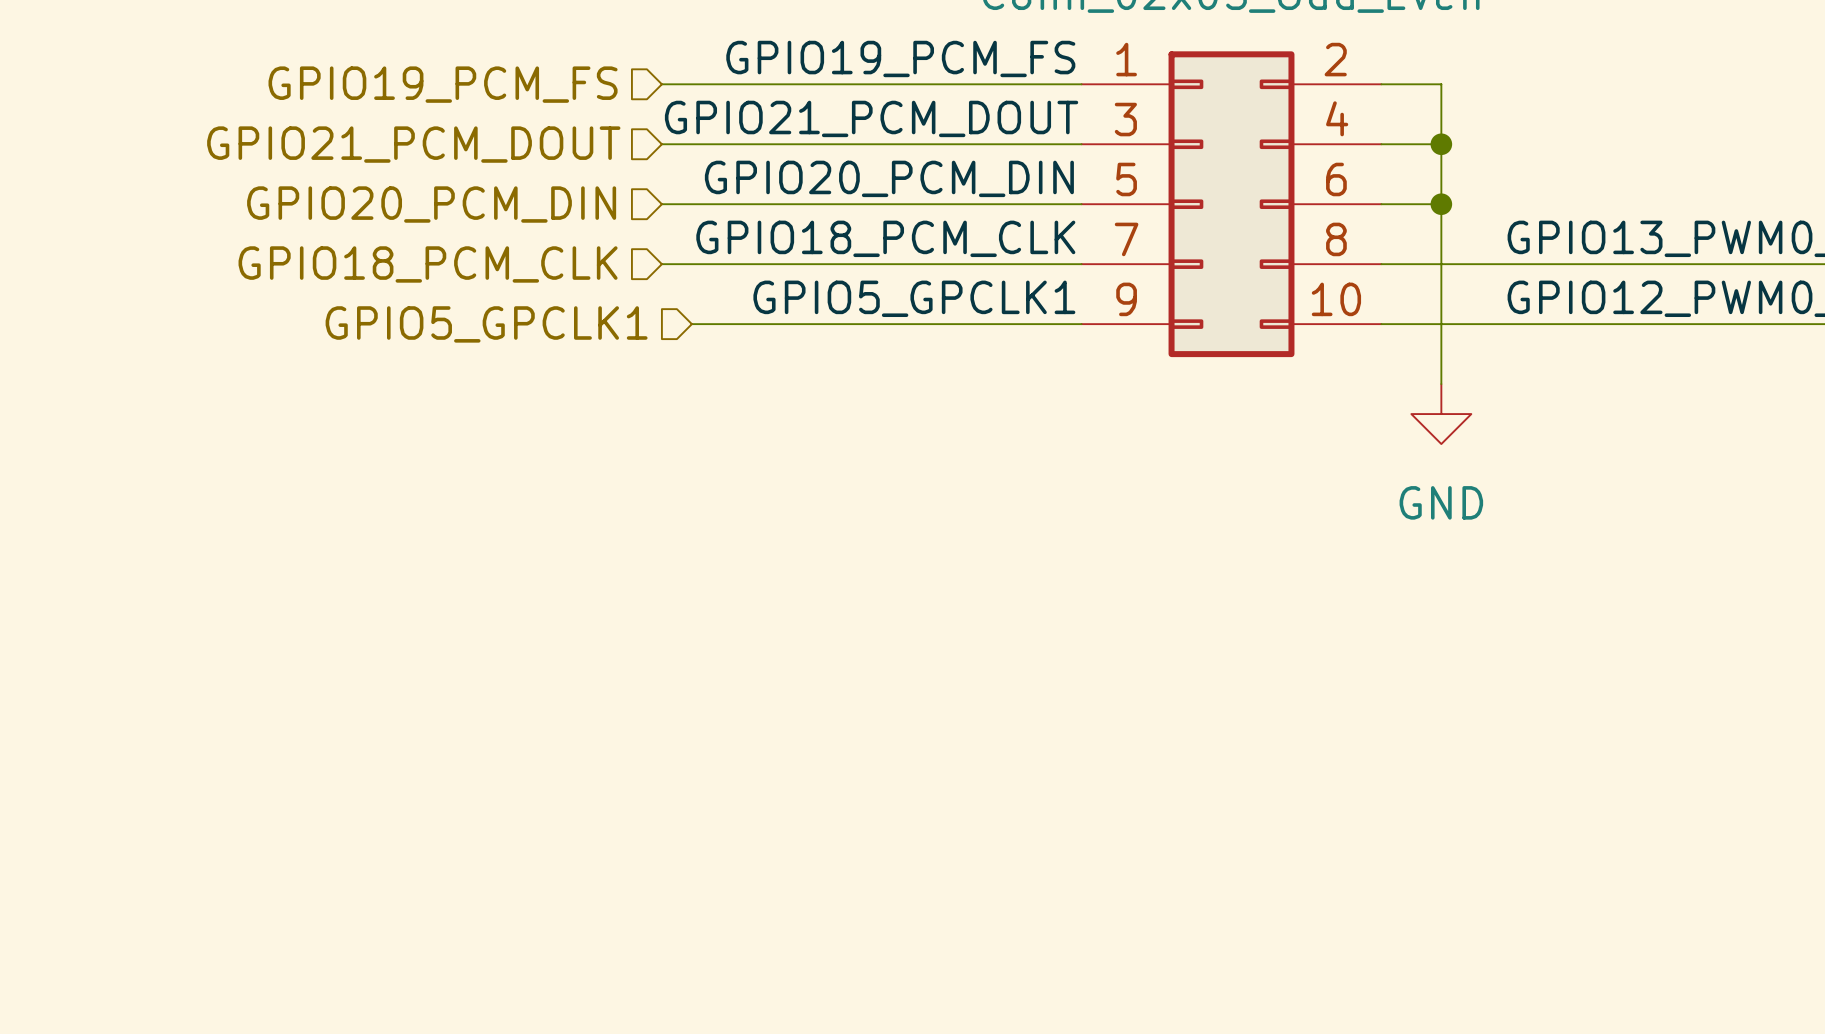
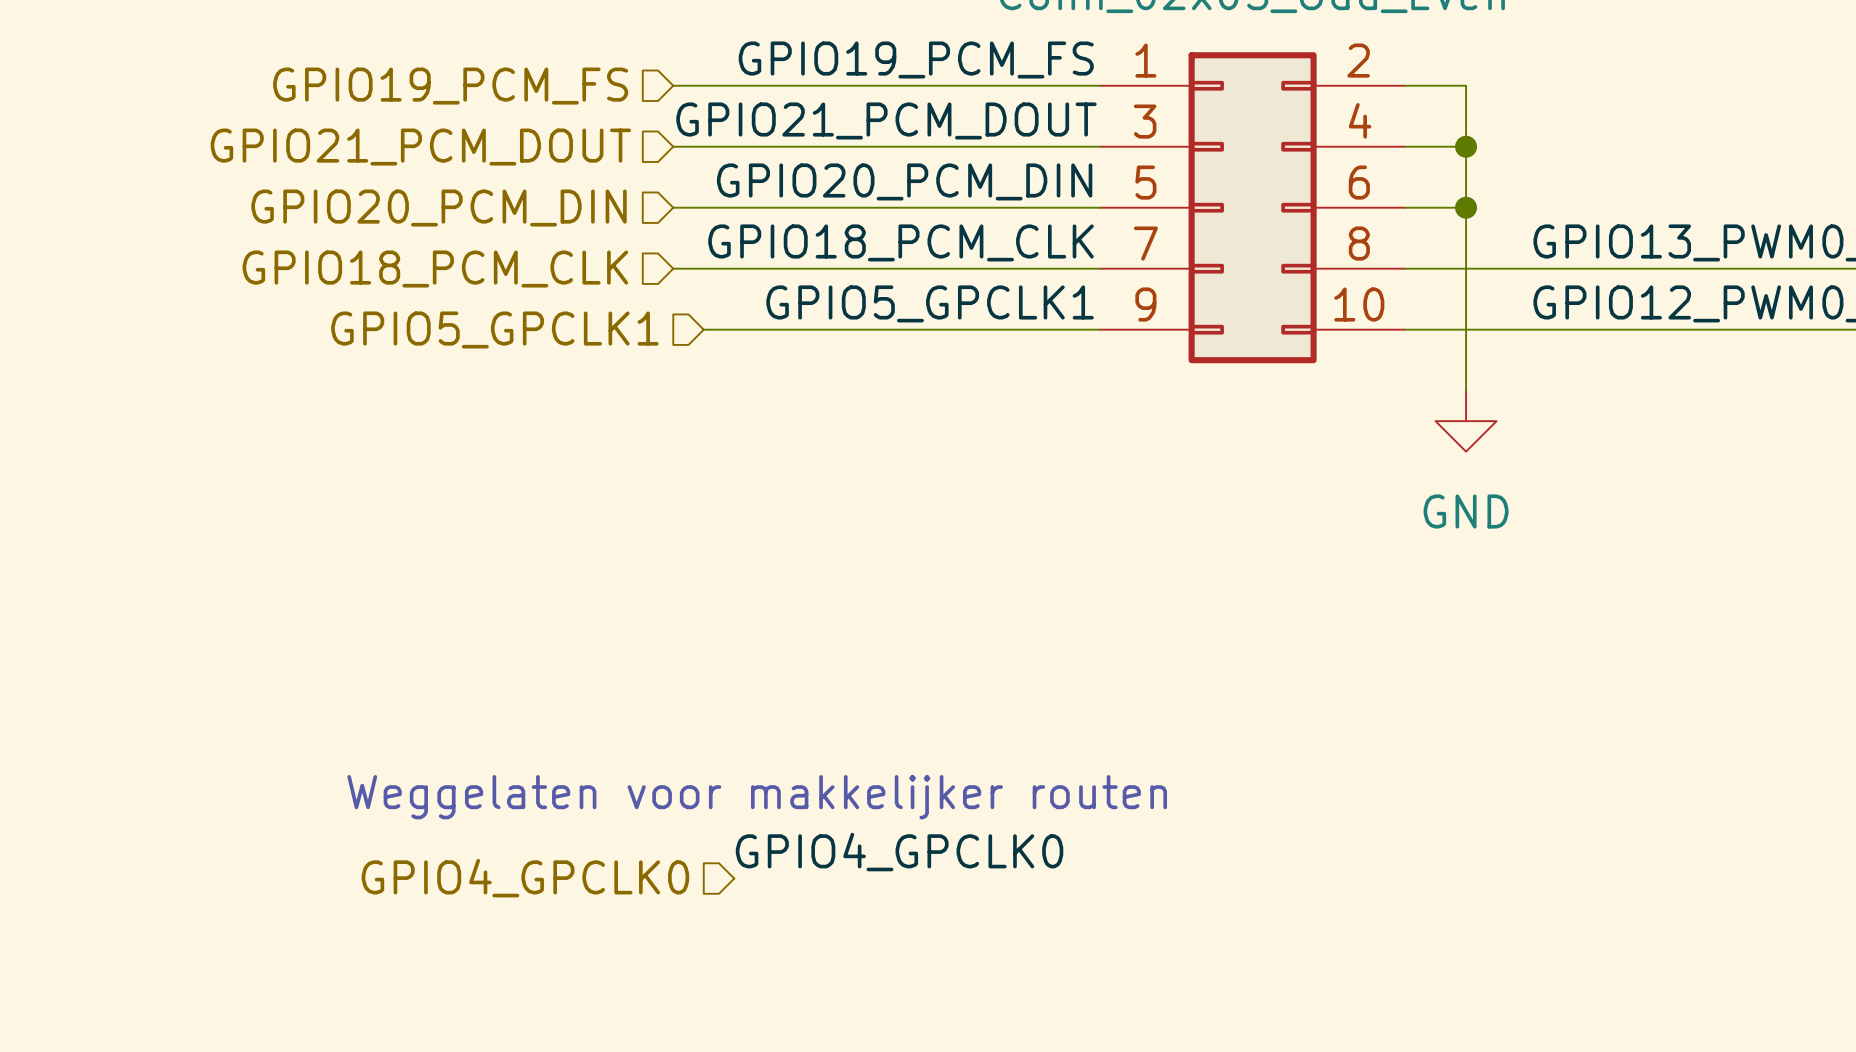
text: none -> Weggelaten voor makkelijker routen (757, 797)
label: none -> GPIO4_GPCLK0 (899, 852)
hierarchical label: none -> GPIO4_GPCLK0 (525, 878)

